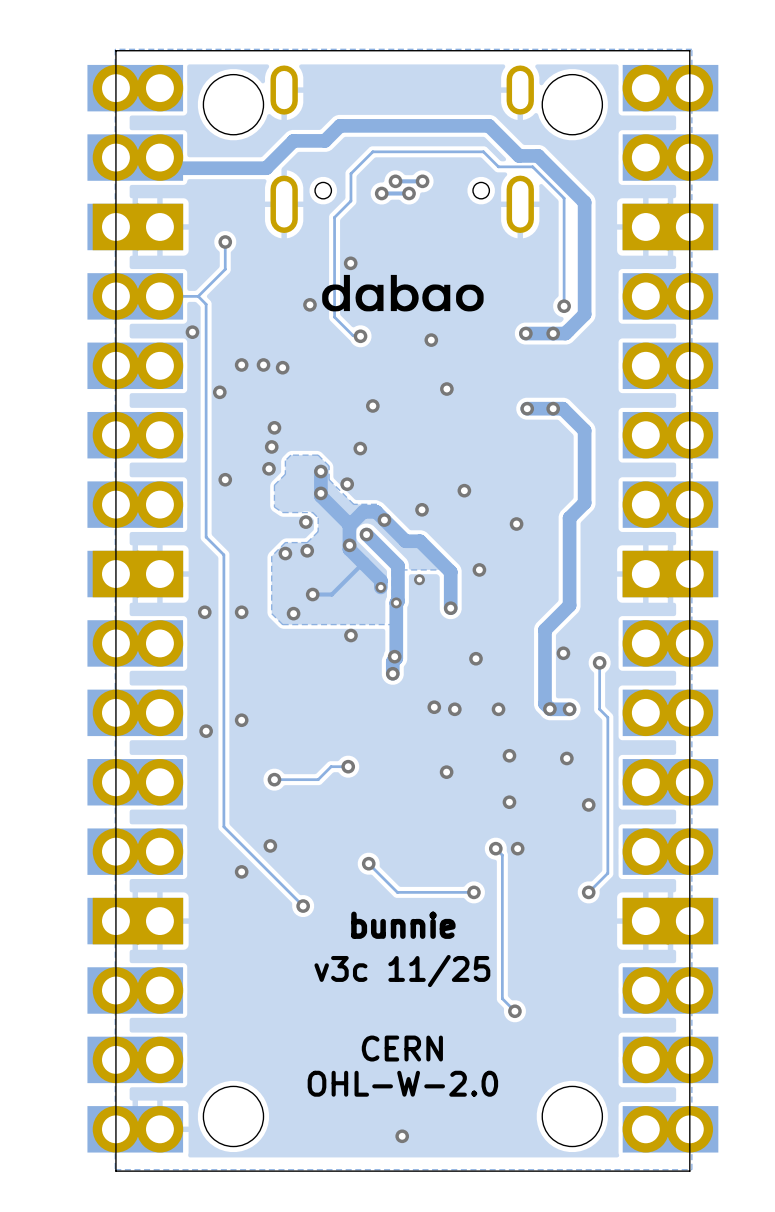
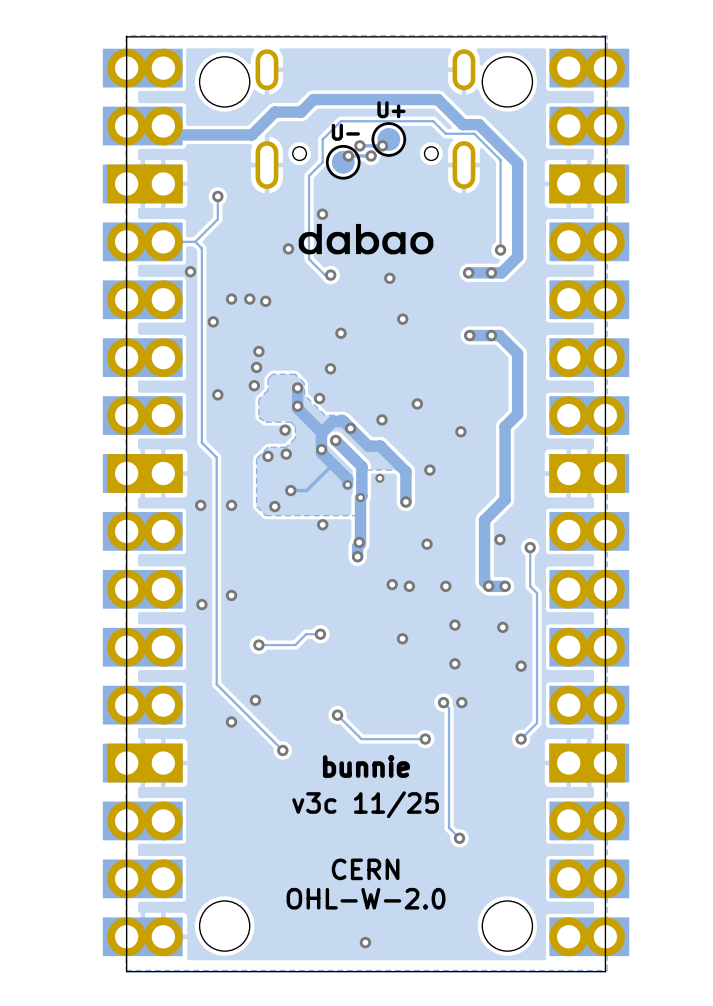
text: none -> U+ (391, 109)
text: none -> U- (345, 132)
part: none -> (388, 139)
part: none -> (343, 162)

